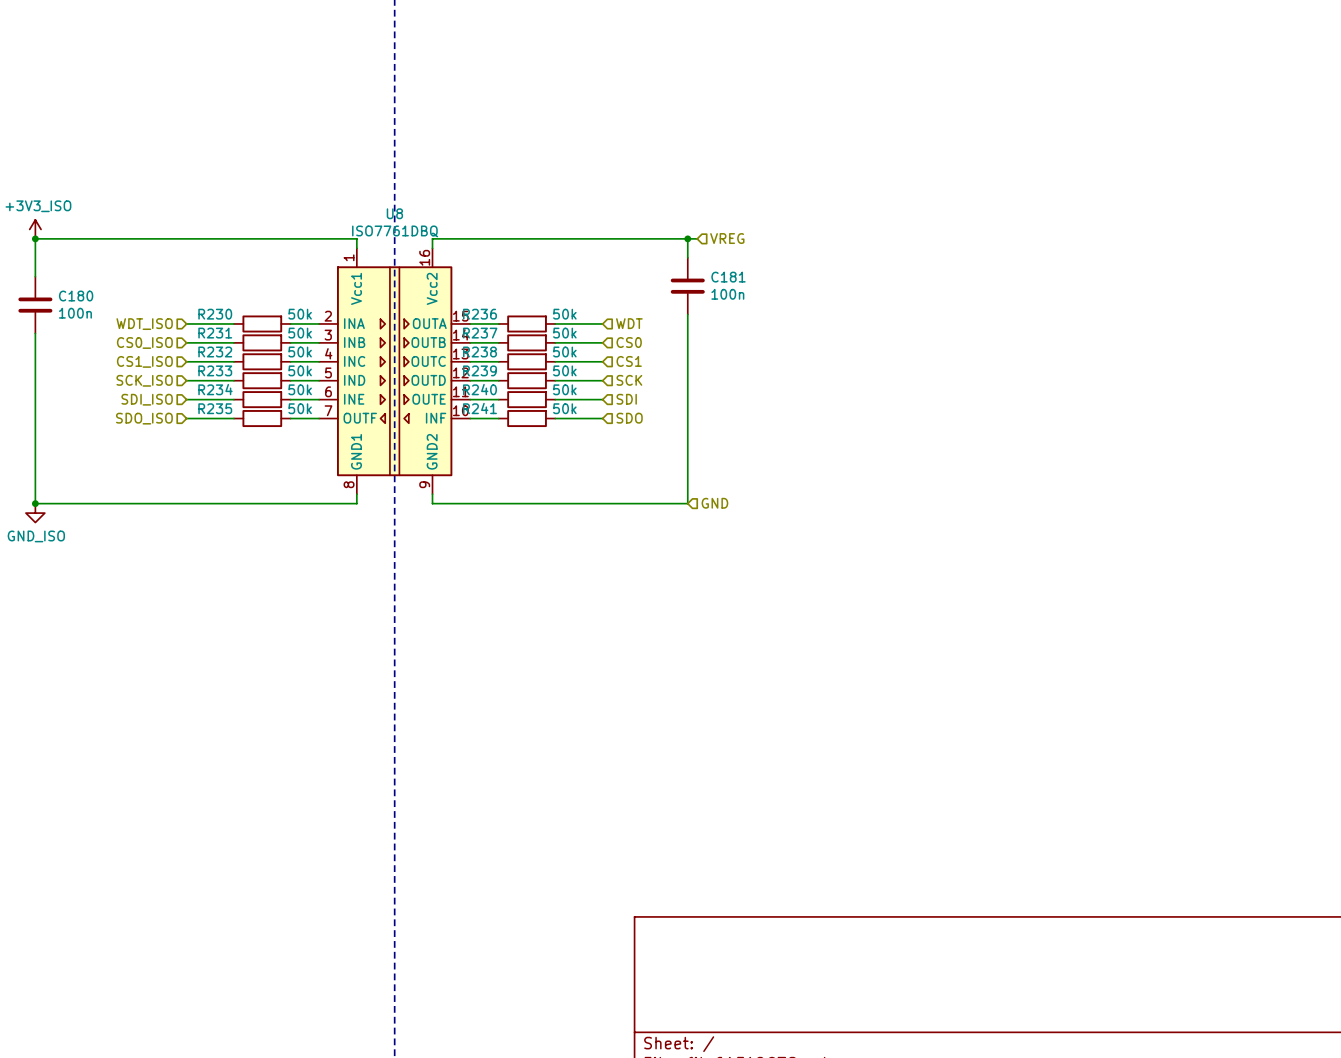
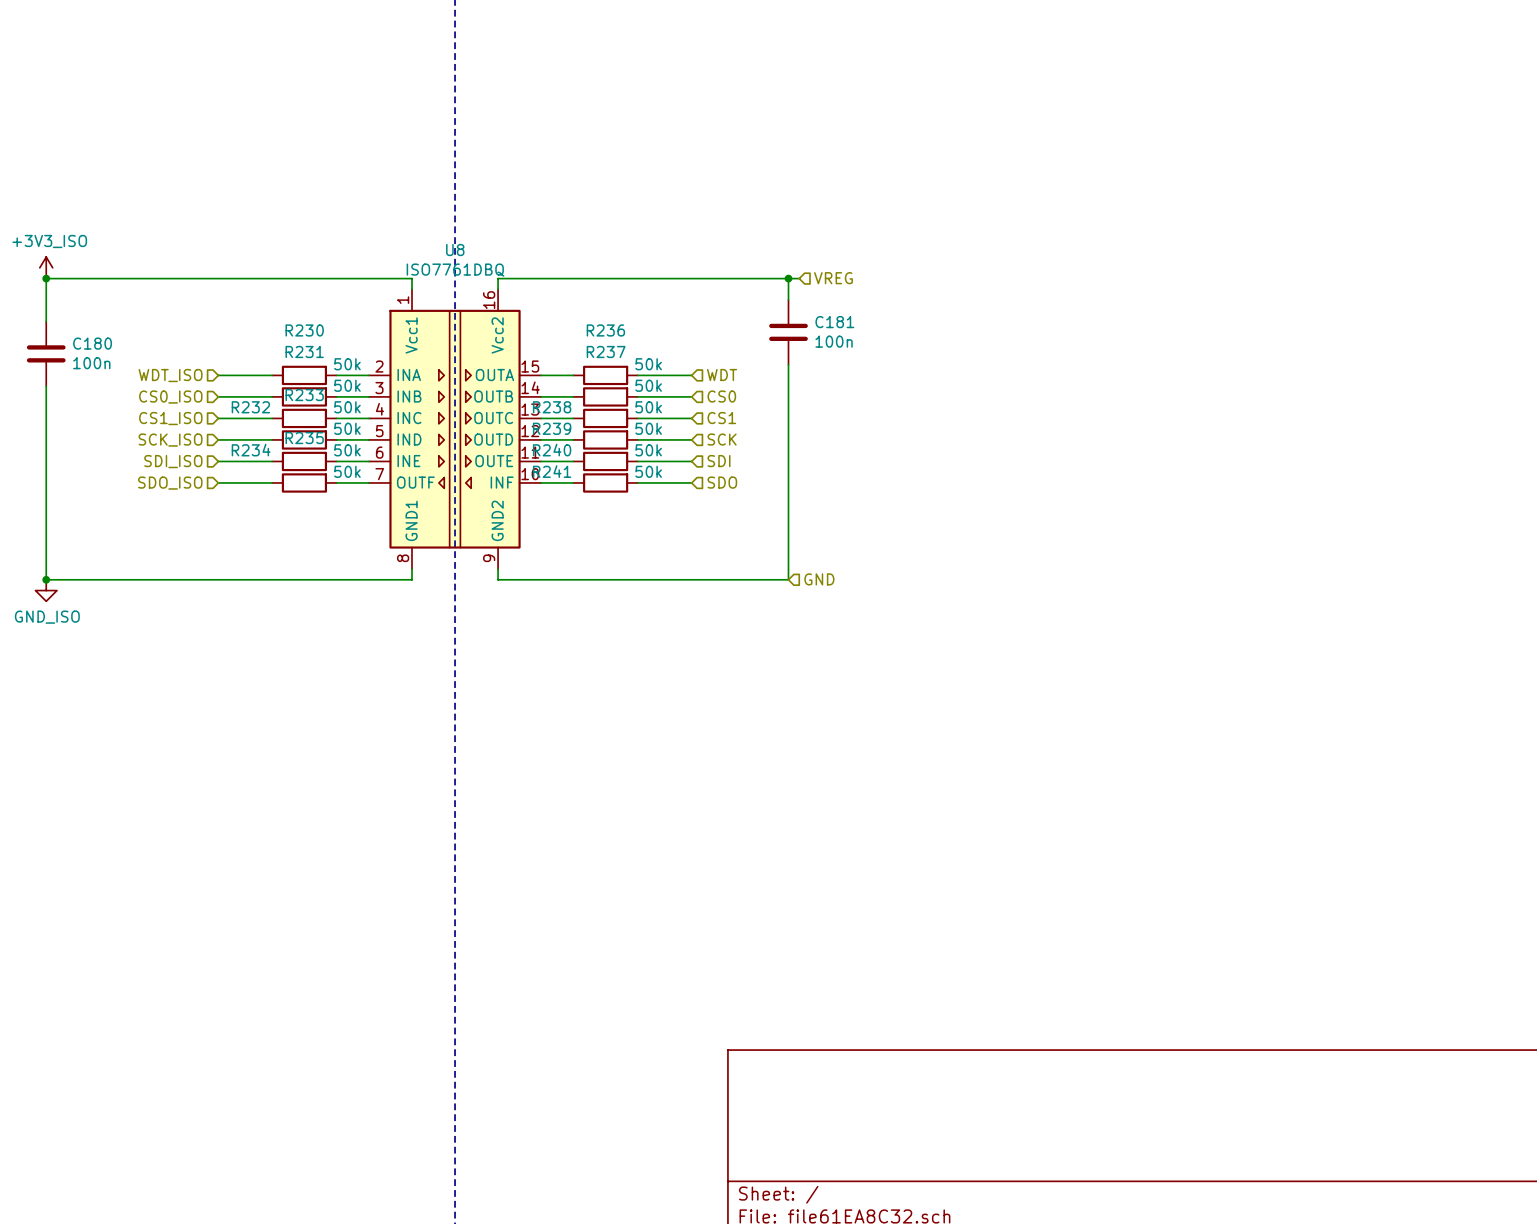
R230 name position: R230 (215, 314) -> R230 (304, 330)
R236 name position: R236 (479, 314) -> R236 (605, 330)
R231 name position: R231 (215, 333) -> R231 (304, 351)
R237 name position: R237 (480, 333) -> R237 (606, 351)
R233 name position: R233 (215, 370) -> R233 (304, 395)
R235 name position: R235 (215, 408) -> R235 (304, 438)

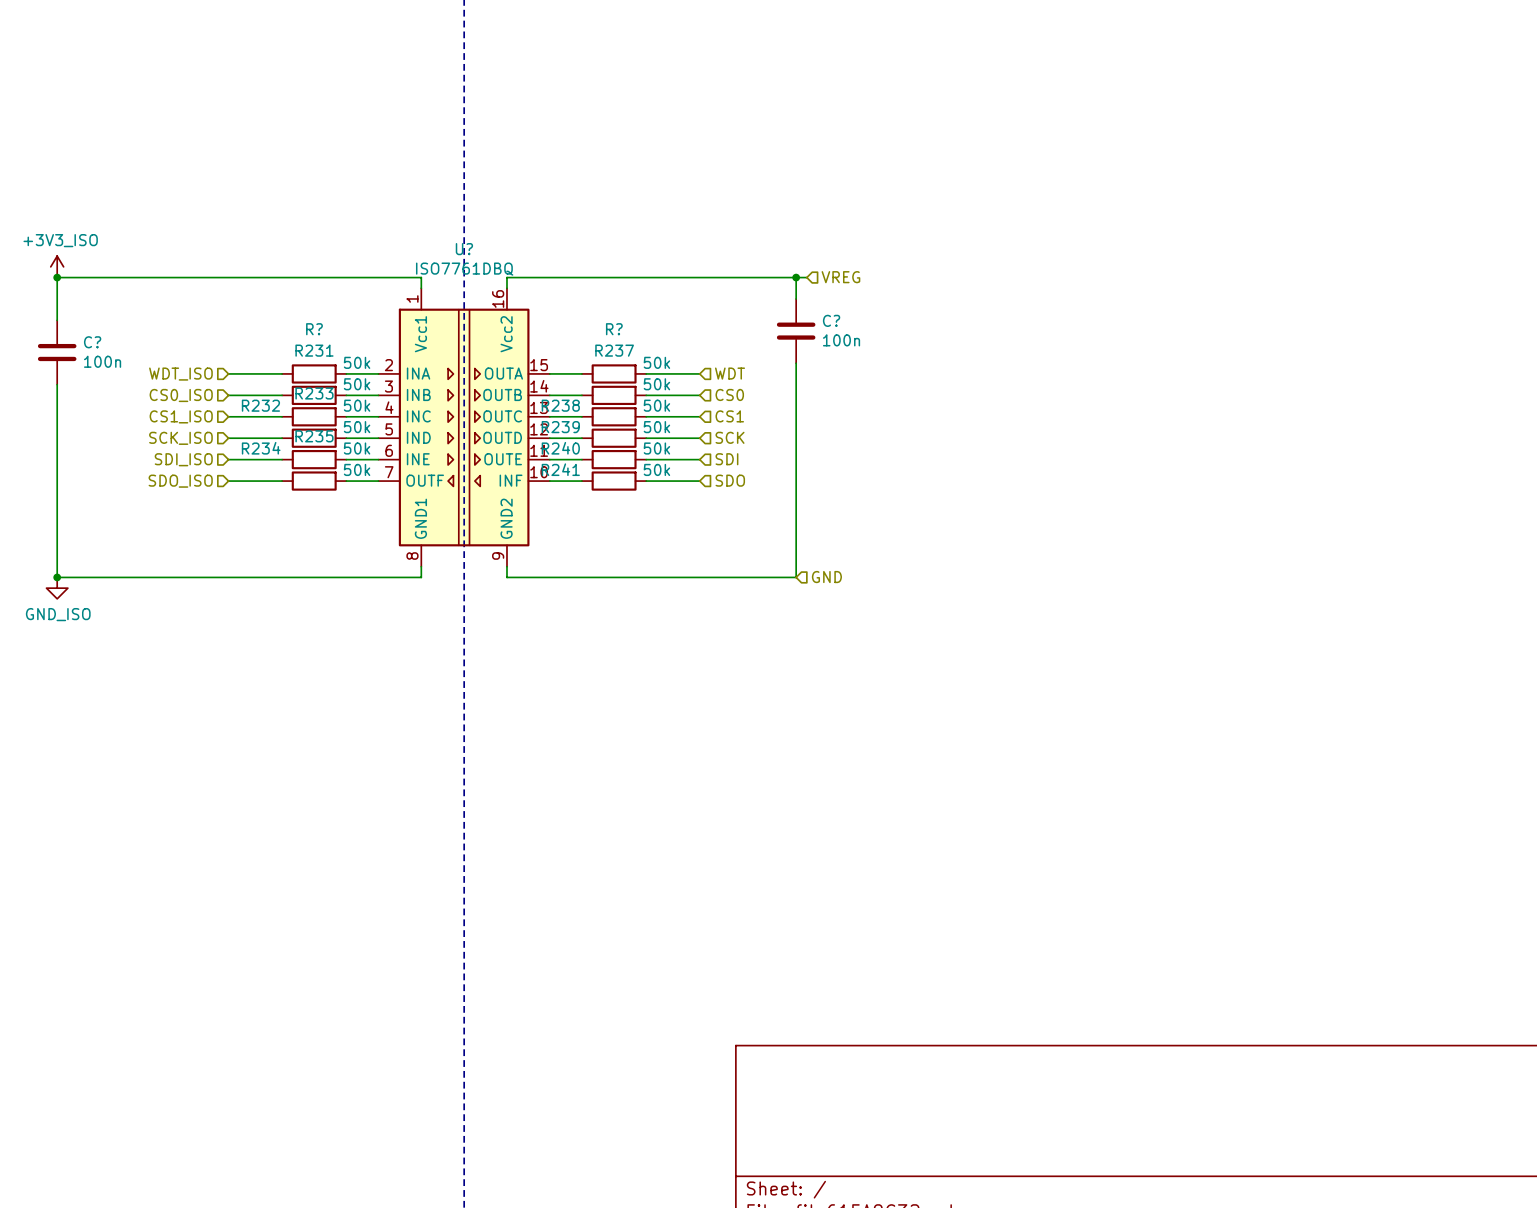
U8 name: U8 (455, 250) -> U? (464, 249)
C181 name: C181 (834, 322) -> C? (831, 320)
R230 name: R230 (304, 330) -> R? (314, 329)
R236 name: R236 (605, 330) -> R? (614, 329)
C180 name: C180 (92, 343) -> C? (92, 342)

